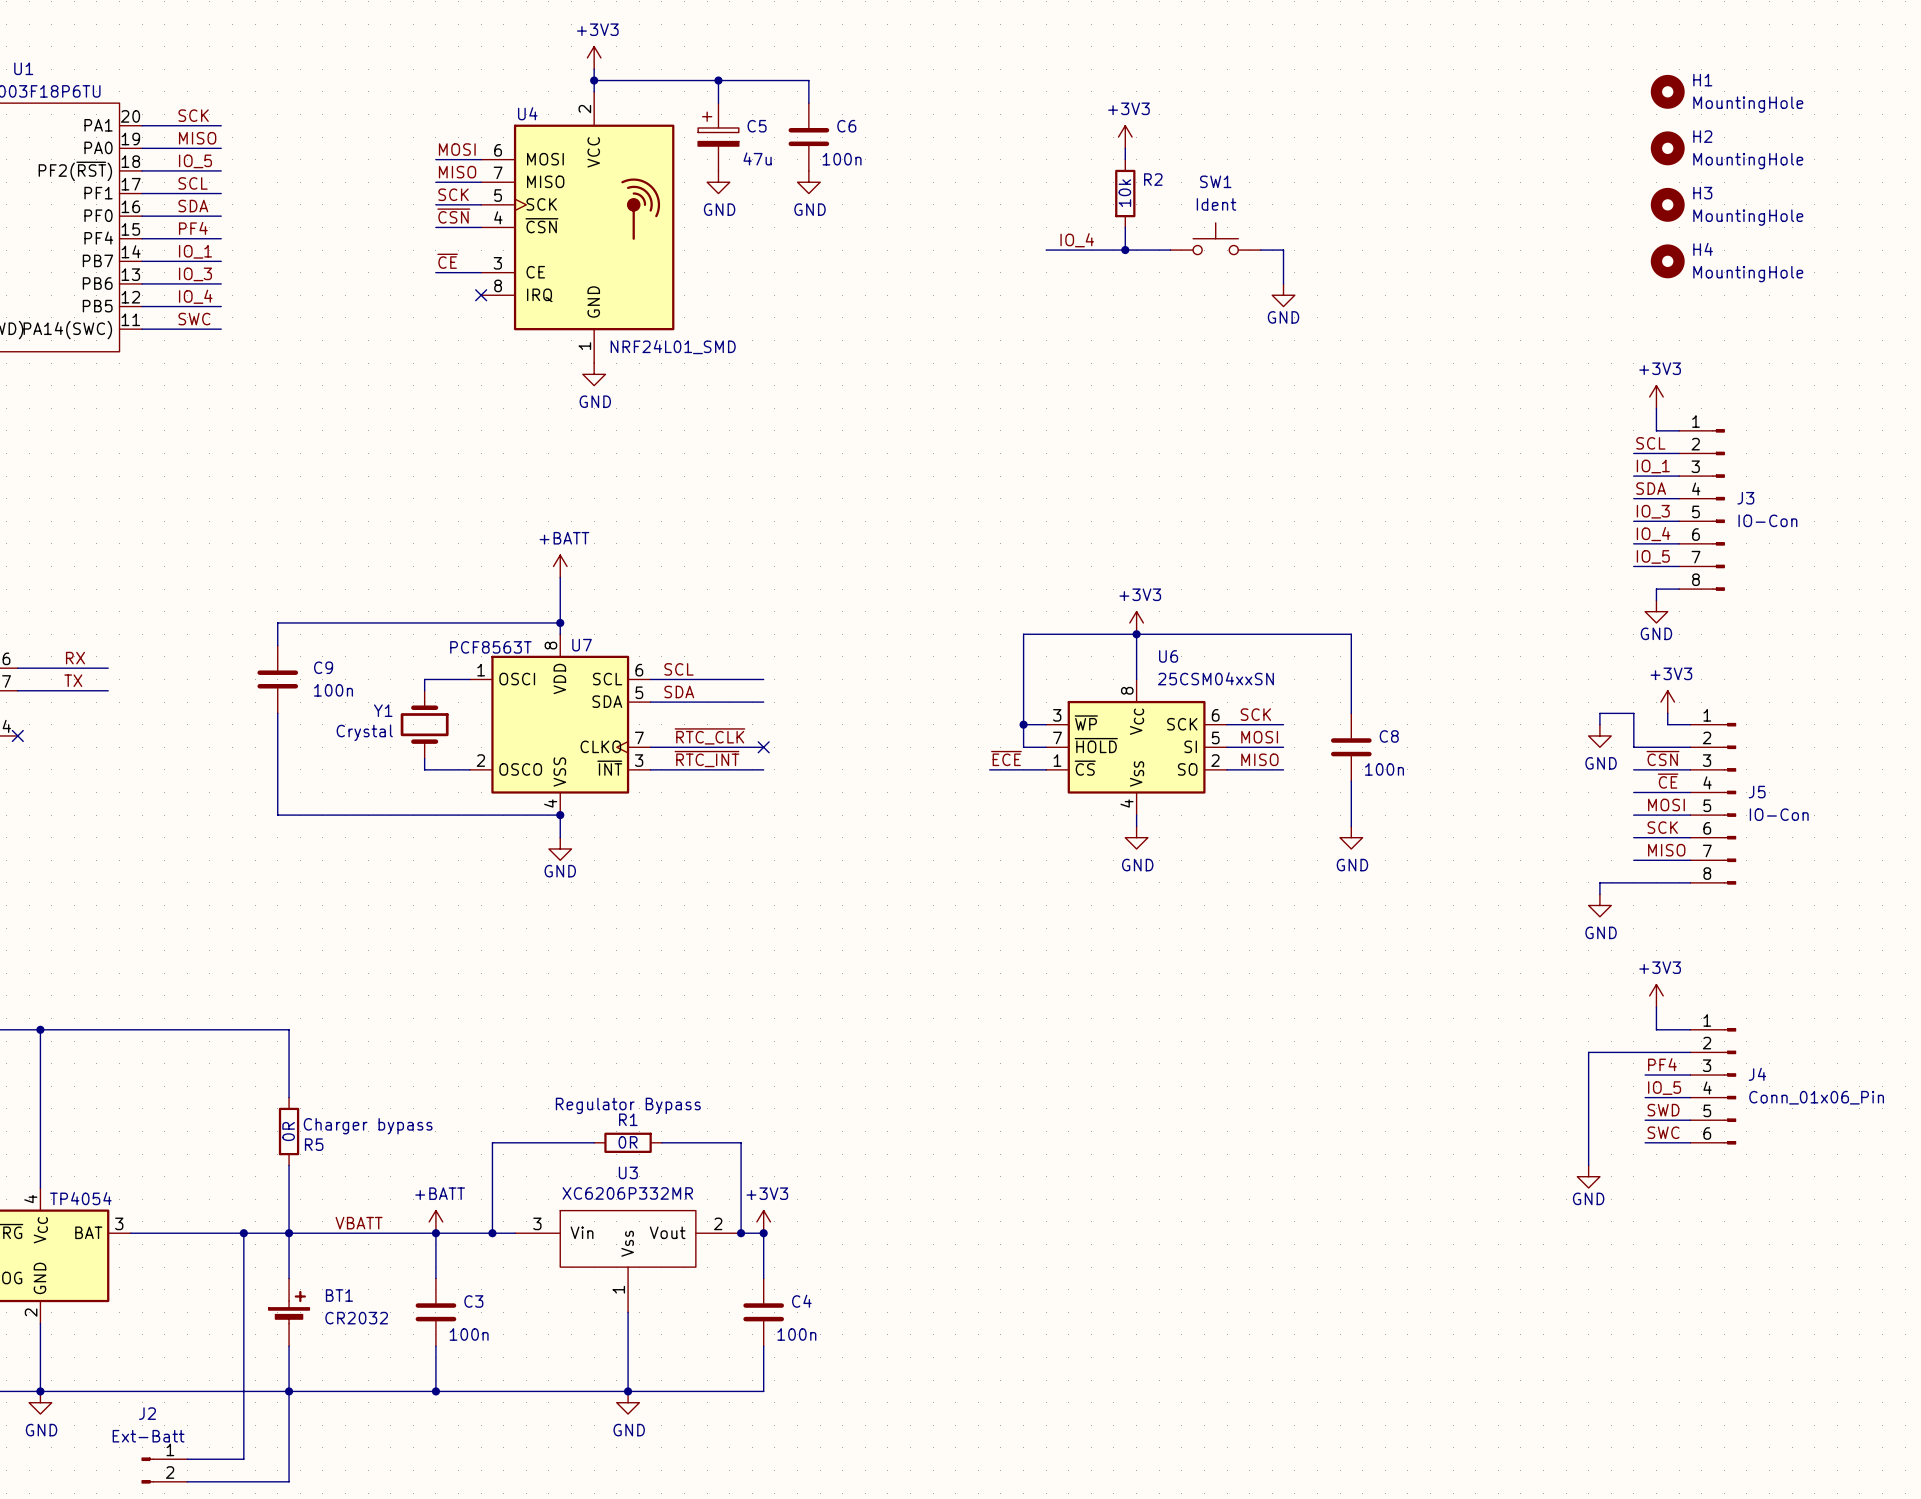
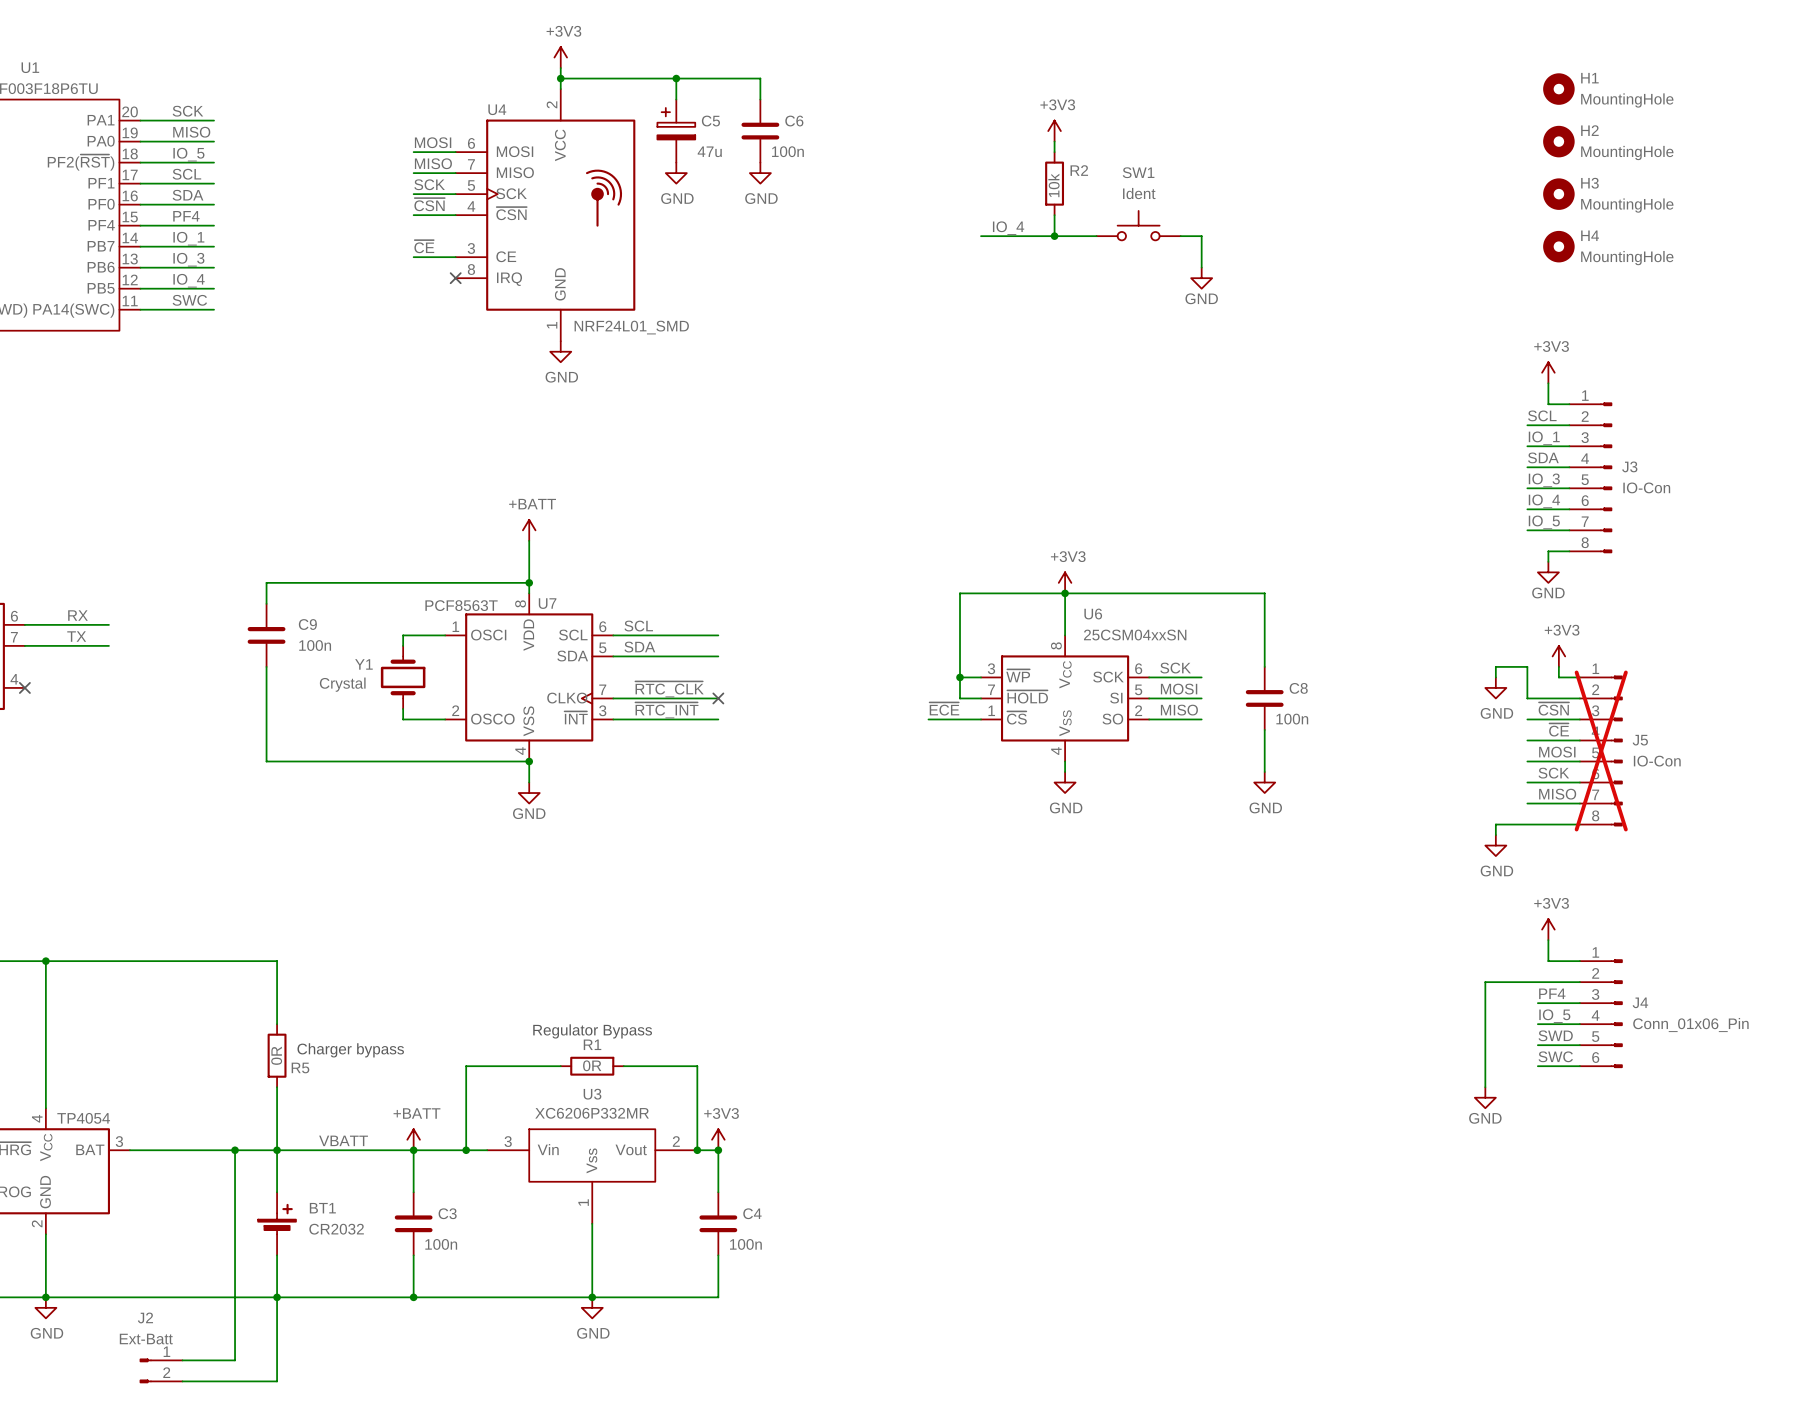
J5 do-not-place cross: none -> (1601, 750)

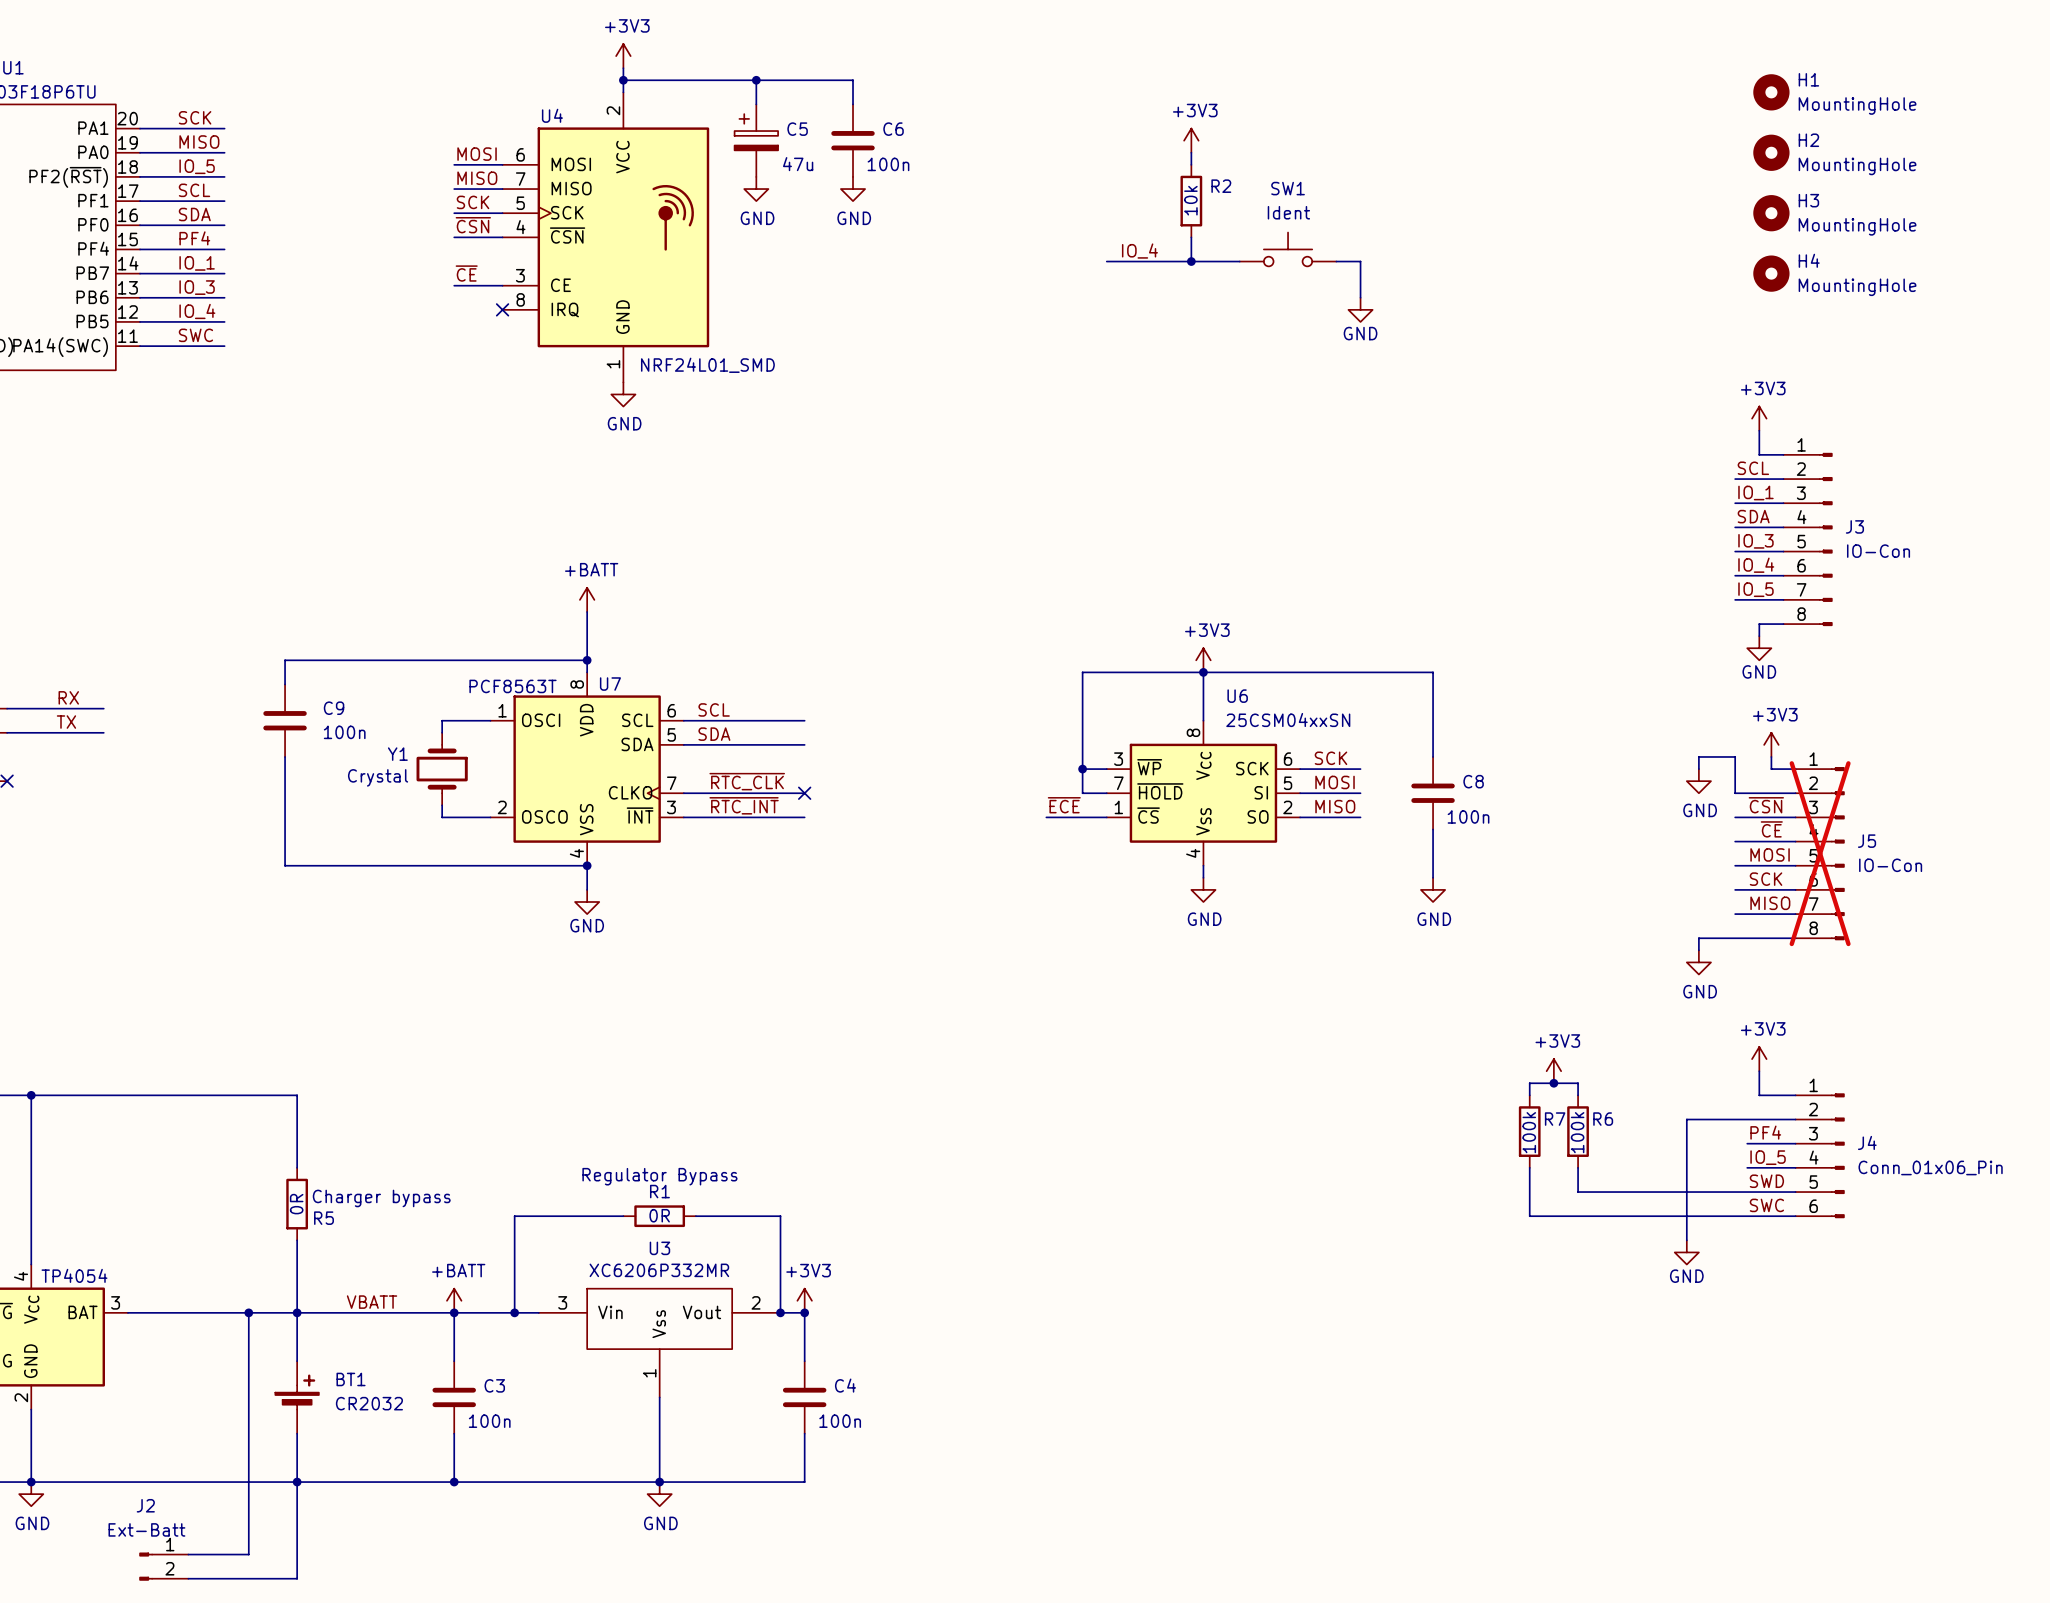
power symbol: none -> +3V3 (1553, 1071)
junction: none -> (1553, 1083)
wire: none -> (1529, 1095) (1529, 1083) (1578, 1083) (1578, 1095)
R7: none -> 100k (1529, 1131)
R6: none -> 100k (1578, 1131)
wire: none -> (1529, 1167) (1529, 1216) (1747, 1216)
wire: none -> (1578, 1167) (1578, 1192) (1747, 1192)

